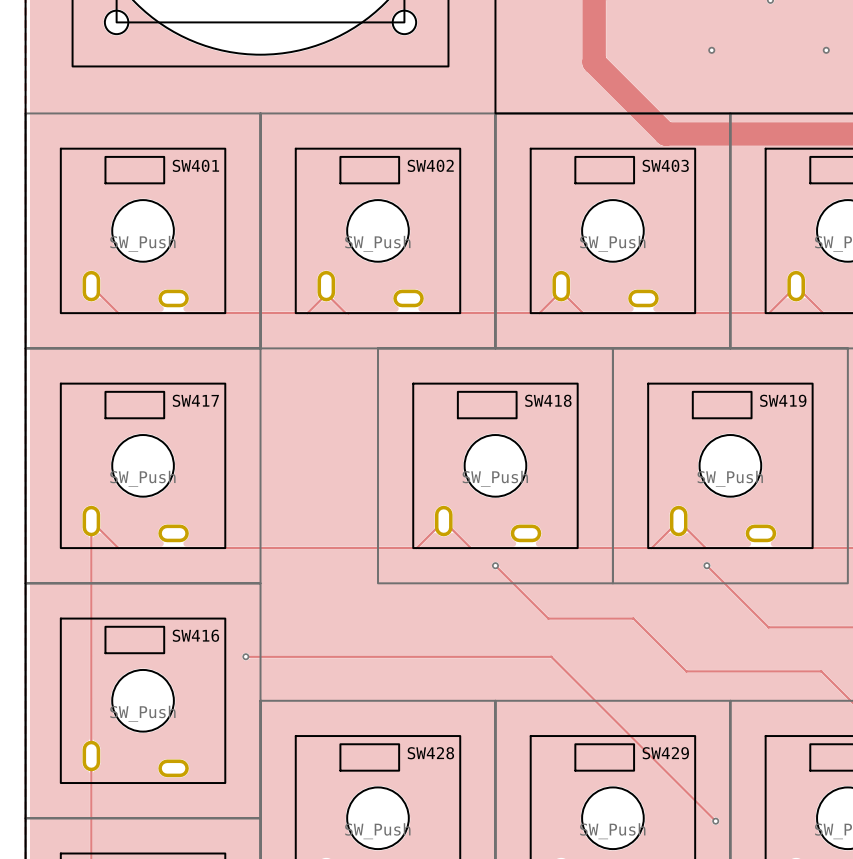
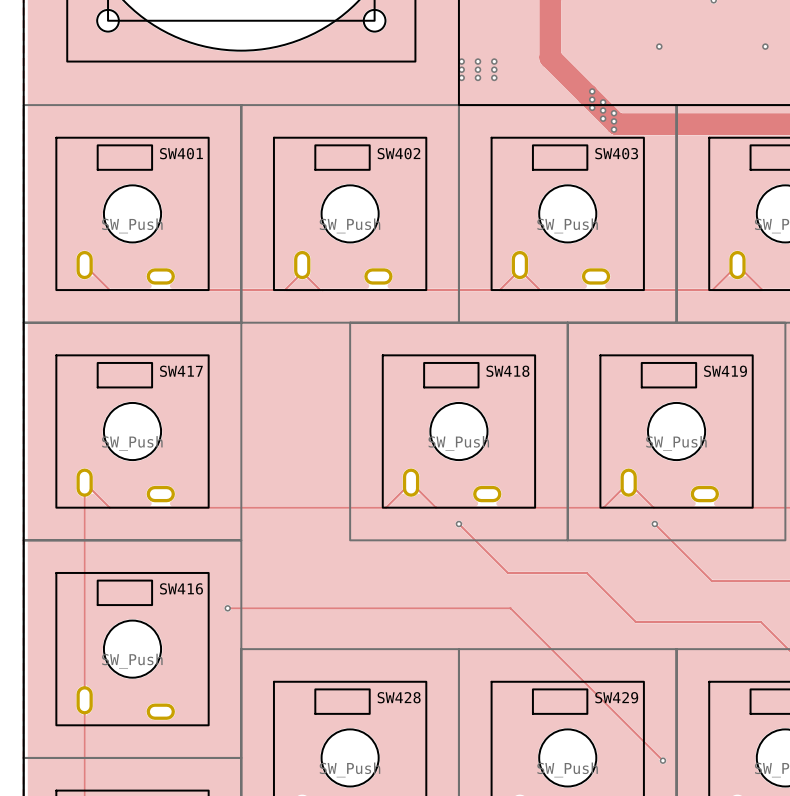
via: none -> (461, 61)
via: none -> (477, 61)
via: none -> (494, 61)
via: none -> (461, 69)
via: none -> (477, 69)
via: none -> (494, 69)
via: none -> (461, 77)
via: none -> (477, 77)
via: none -> (494, 77)
via: none -> (592, 91)
via: none -> (592, 99)
via: none -> (603, 102)
via: none -> (592, 107)
via: none -> (603, 110)
via: none -> (614, 113)
via: none -> (603, 118)
via: none -> (614, 121)
via: none -> (614, 129)

